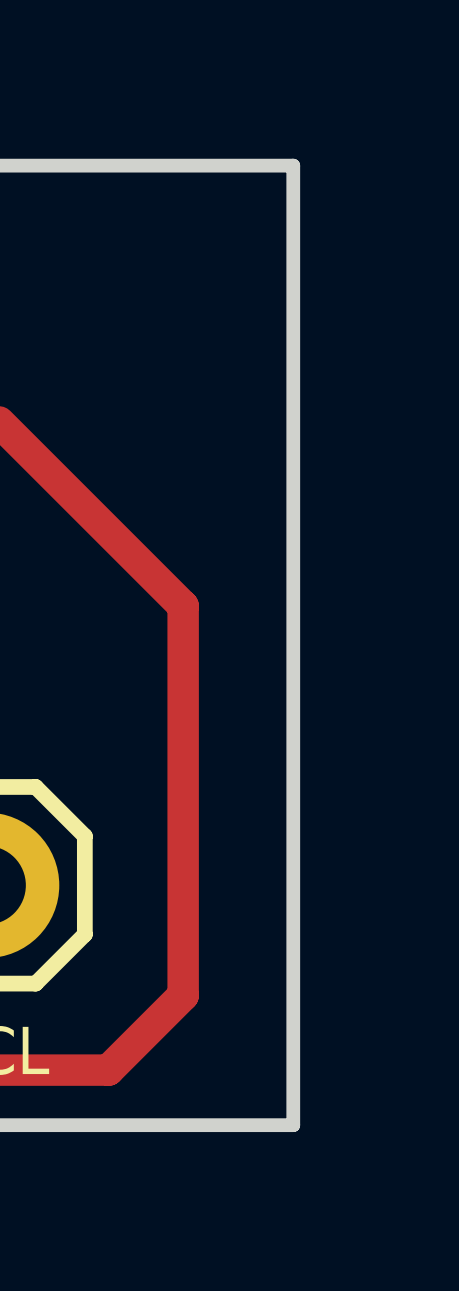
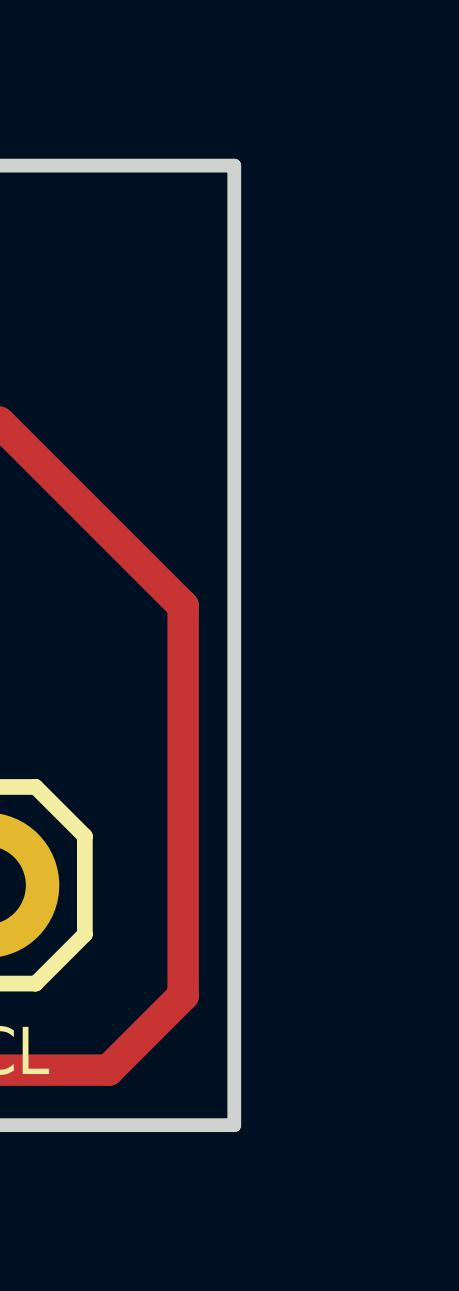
board edge: (234, 165) (293, 165) (293, 1125) (234, 1125) -> (234, 165) (234, 1125)

